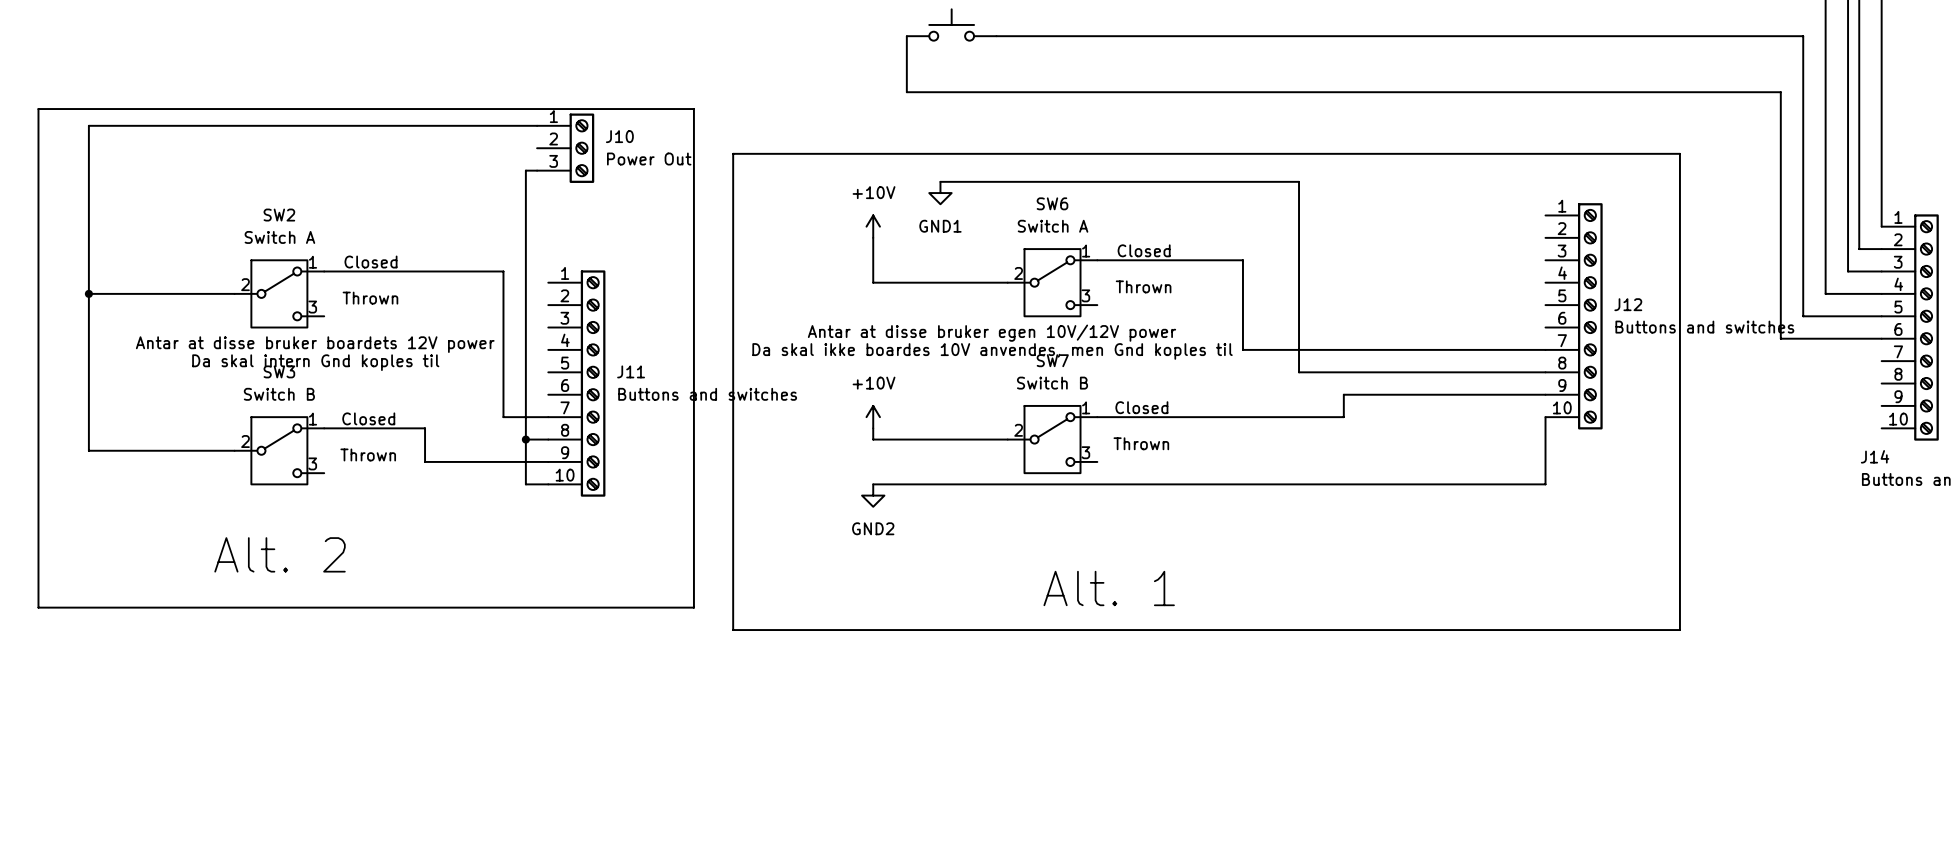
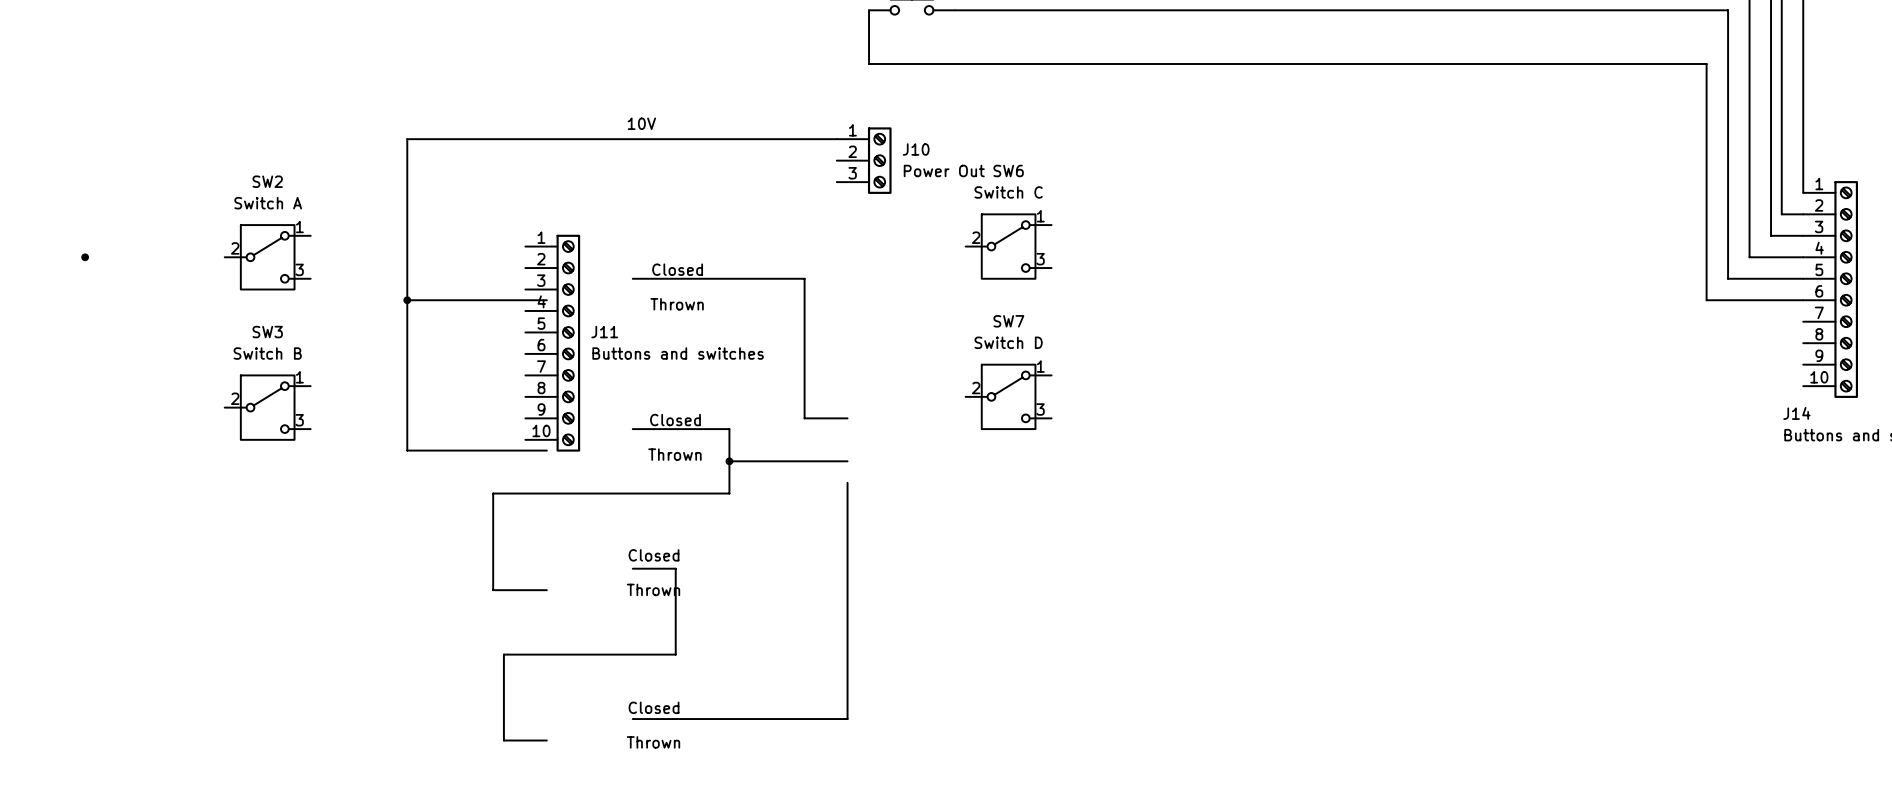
line: (38, 109) (693, 109) (693, 607) (38, 607) (38, 109) -> none
wire: (537, 125) (88, 125) (88, 450) (234, 450) -> none
J10 position: (565, 148) -> (864, 160)
line: (733, 153) (1679, 153) (1679, 630) (733, 630) (733, 153) -> none
text: none -> 10V (641, 123)
wire: (525, 170) (525, 484) (548, 484) -> (503, 139) (407, 139) (407, 386)
wire: none -> (514, 139) (836, 139)
wire: (940, 181) (1299, 181) (1299, 372) (1545, 372) -> none
power symbol: GND1 (940, 193) -> none
power symbol: +10V (873, 226) -> none
SW6 value: Switch A (1053, 226) -> Switch C (1008, 192)
wire: (873, 237) (873, 282) (1007, 282) -> none
text: Closed (1144, 250) -> none
wire: (1097, 260) (1242, 260) (1242, 349) (1545, 349) -> none
text: Closed (370, 262) -> none
wire: (324, 271) (503, 271) (503, 417) (548, 417) -> none
text: Thrown (1143, 286) -> none
wire: (88, 293) (234, 293) -> none
text: Thrown (370, 298) -> none
text: none -> Closed (677, 269)
wire: none -> (632, 278) (804, 278) (804, 418) (847, 418)
J12: Buttons and switches (1574, 316) -> none
text: Antar at disse bruker egen 10V/12V power (992, 333) -> none
wire: none -> (407, 300) (546, 300)
junction: none -> (407, 300)
text: none -> Thrown (677, 304)
text: Antar at disse bruker boardets 12V power (315, 344) -> none
text: Da skal ikke boardes 10V anvendes, men Gnd koples til (992, 351) -> none
text: Da skal intern Gnd koples til (315, 362) -> none
SW7 value: Switch B (1052, 383) -> Switch D (1008, 342)
wire: (1545, 394) (1343, 394) (1343, 417) (1097, 417) -> none
text: Closed (1141, 407) -> none
power symbol: +10V (873, 417) -> none
wire: (1545, 417) (1545, 484) (873, 484) -> none
text: Closed (368, 418) -> none
wire: (324, 428) (425, 428) -> none
wire: (873, 428) (873, 439) (1007, 439) -> none
wire: (525, 439) (548, 439) -> none
junction: (525, 439) -> none
text: Thrown (1141, 443) -> none
text: Thrown (368, 454) -> none
wire: (425, 461) (548, 461) -> (407, 418) (407, 450) (546, 450)
text: none -> Closed (675, 420)
wire: none -> (632, 429) (729, 429) (729, 493) (493, 493) (493, 590) (546, 590)
power symbol: GND2 (873, 495) -> none
text: none -> Thrown (674, 454)
wire: none -> (729, 461) (847, 461)
junction: none -> (729, 461)
wire: none -> (847, 482) (847, 719) (632, 719)
text: Alt. 2 (280, 554) -> none
text: Alt. 1 (1109, 588) -> none
text: none -> Closed (654, 555)
wire: none -> (632, 568) (675, 568) (675, 654) (503, 654) (503, 740) (546, 740)
text: none -> Thrown (653, 589)
text: none -> Closed (654, 707)
text: none -> Thrown (653, 742)

